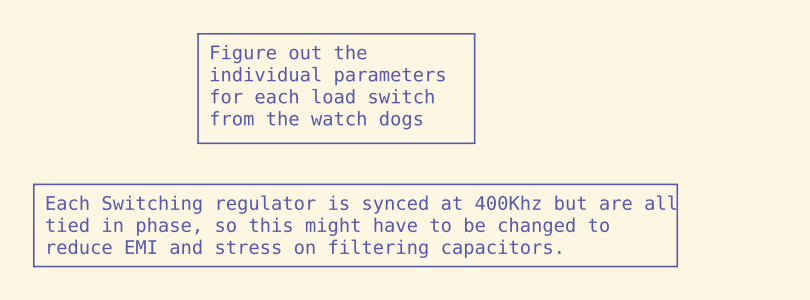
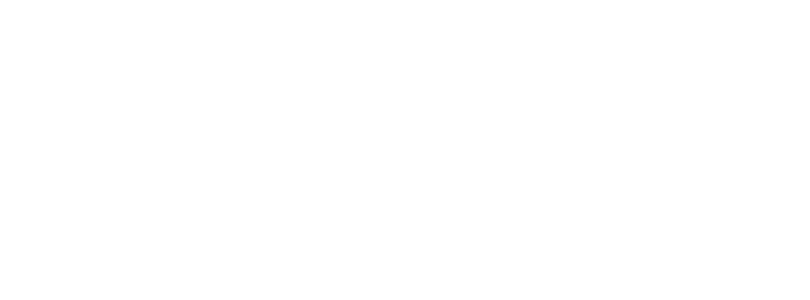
line: (198, 33) (474, 33) (474, 143) (198, 143) (198, 33) -> none
text: Figure out the (288, 54) -> none
text: individual parameters (327, 76) -> none
text: for each load switch (322, 96) -> none
text: from the watch dogs (316, 120) -> none
line: (33, 184) (677, 184) (677, 266) (33, 266) (33, 184) -> none
text: Each Switching regulator is synced at 400Khz but are all (361, 204) -> none
text: tied in phase, so this might have to be changed to (327, 226) -> none
text: reduce EMI and stress on filtering capacitors. (304, 248) -> none

